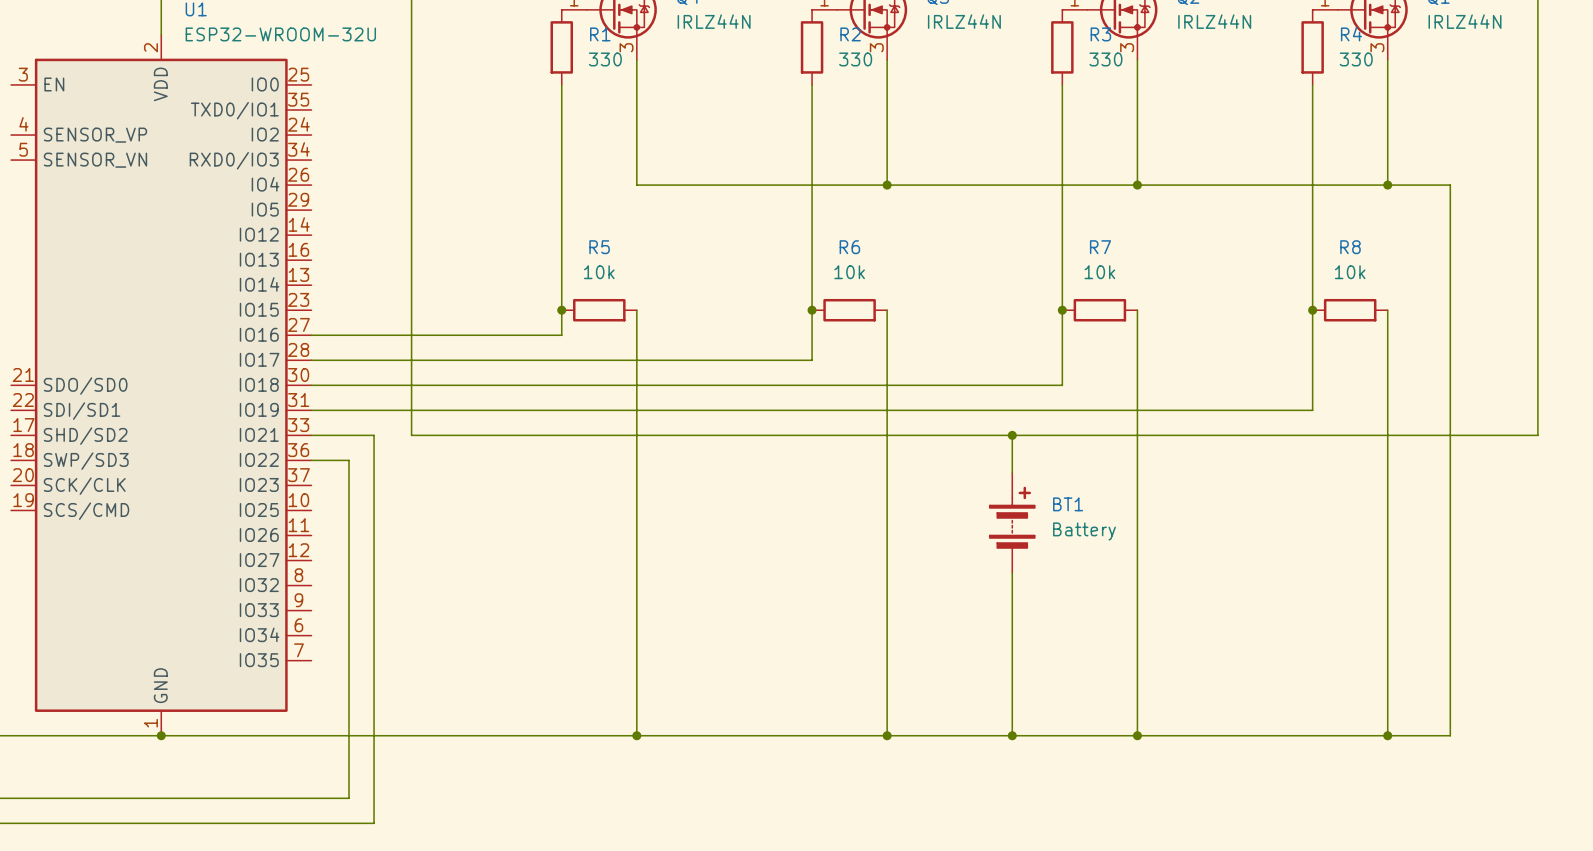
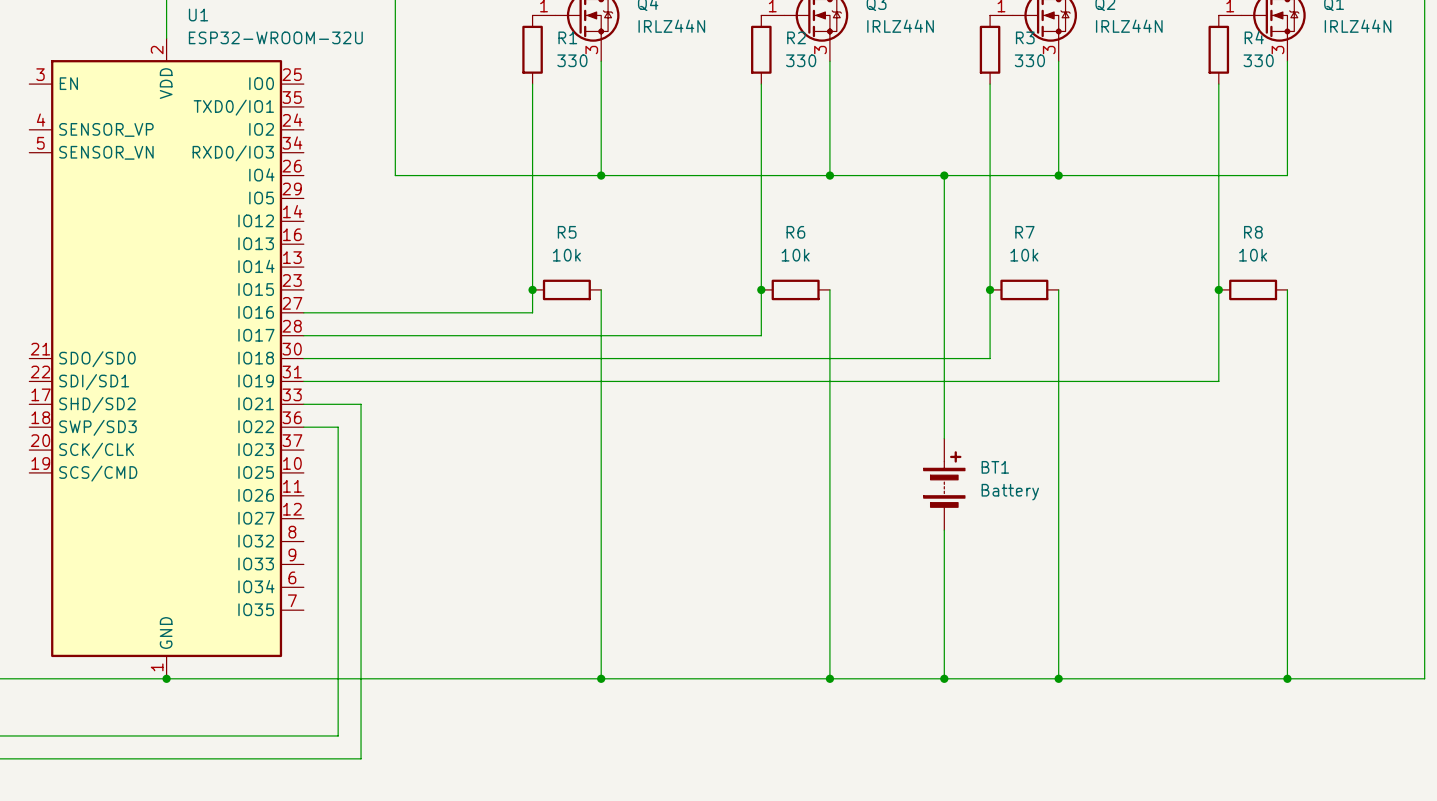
wire: (411, 185) (411, 435) (1537, 435) -> (395, 175) (601, 175)
junction: none -> (601, 175)
wire: none -> (944, 175) (944, 404)
junction: none -> (944, 175)
wire: (1387, 185) (1450, 185) (1450, 735) -> (1424, 404) (1424, 678) (1344, 678)
junction: (1387, 185) -> none
junction: (1012, 435) -> none

